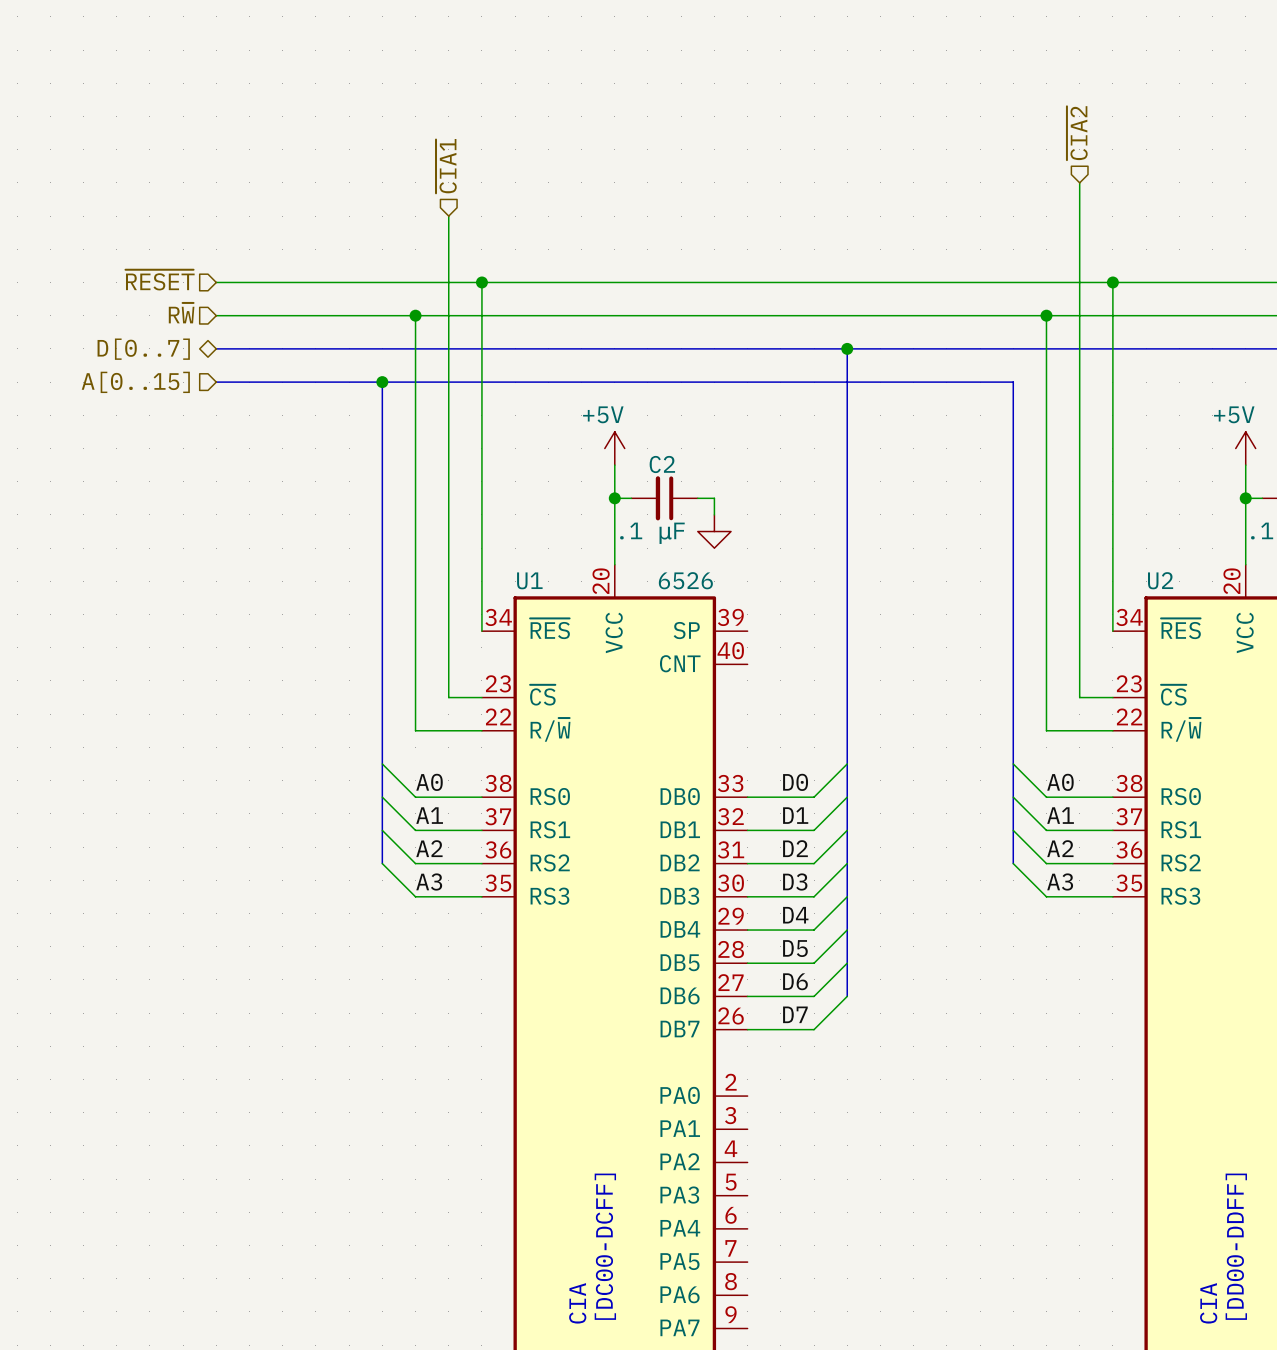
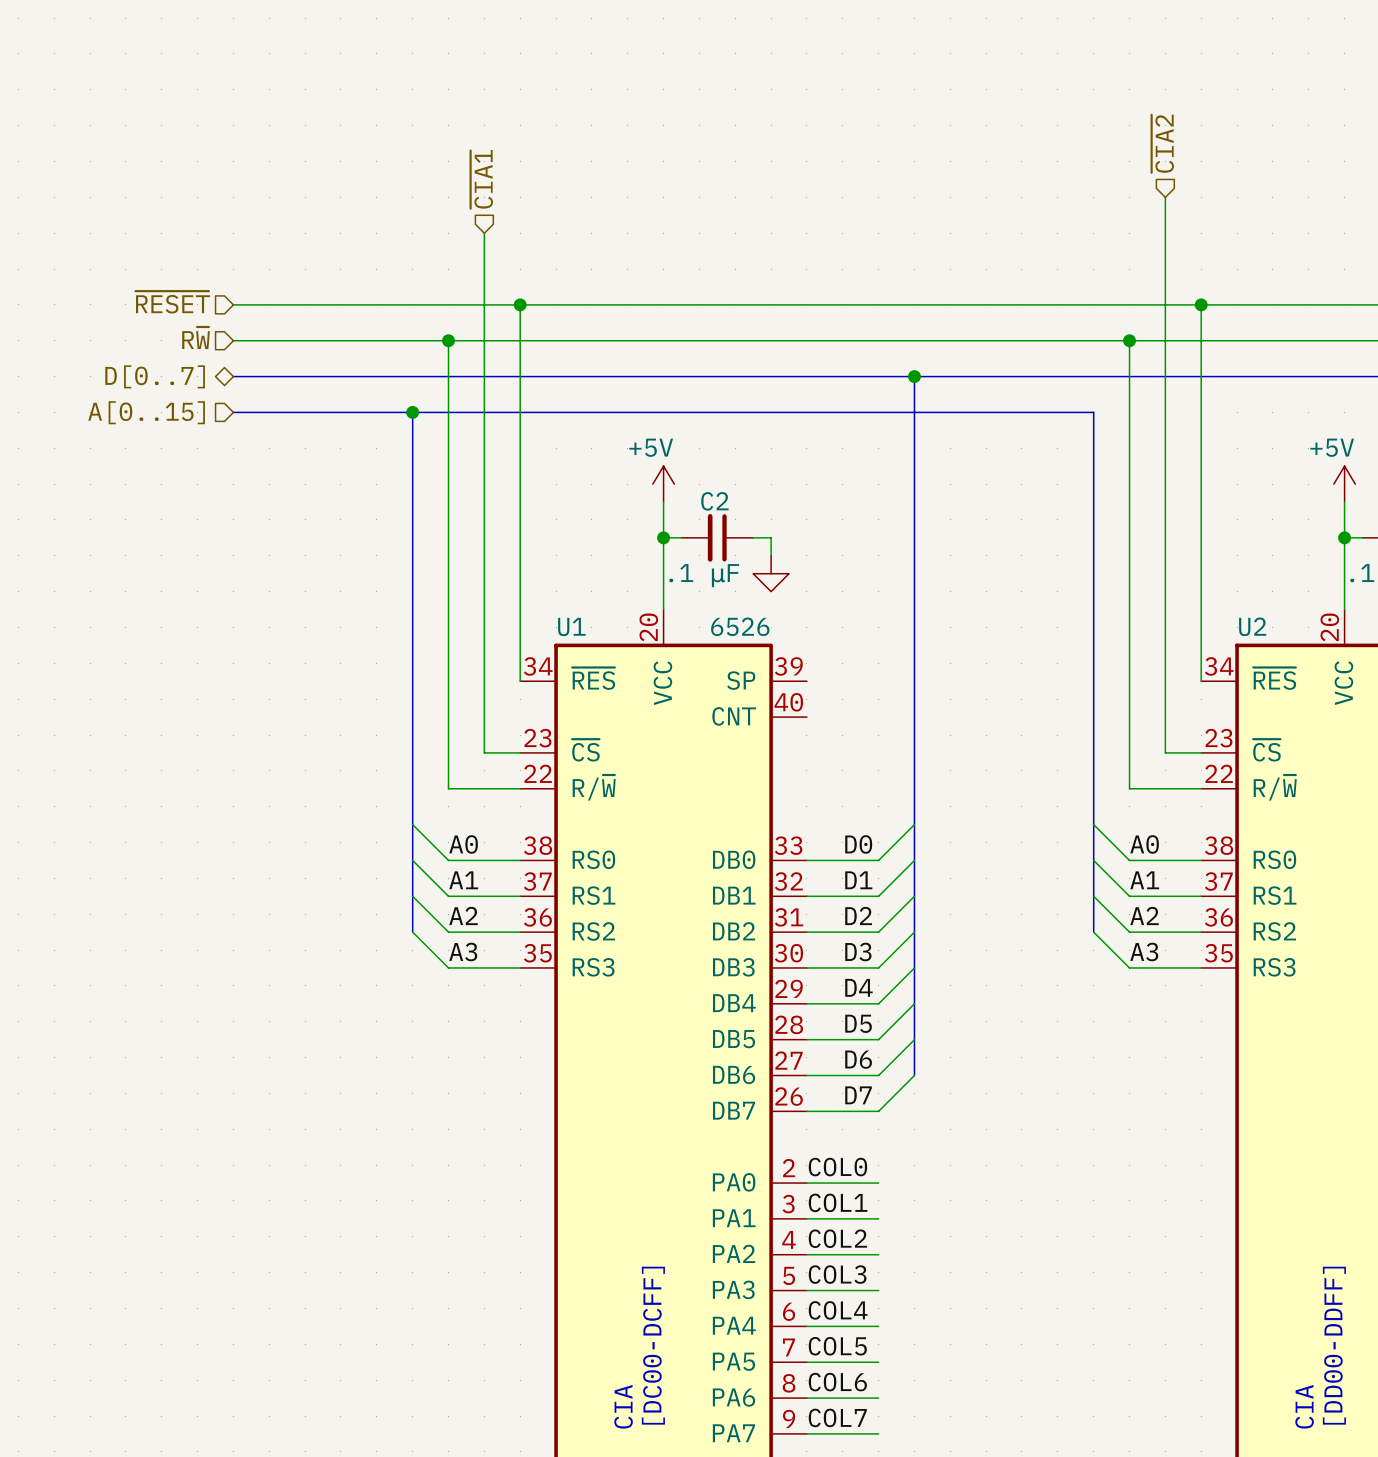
label: none -> COL0 (837, 1167)
wire: none -> (806, 1183) (878, 1183)
label: none -> COL1 (838, 1202)
wire: none -> (806, 1218) (878, 1218)
label: none -> COL2 (837, 1238)
wire: none -> (806, 1254) (878, 1254)
label: none -> COL3 (837, 1274)
wire: none -> (806, 1290) (878, 1290)
label: none -> COL4 (838, 1310)
wire: none -> (806, 1326) (878, 1326)
label: none -> COL5 (837, 1346)
wire: none -> (806, 1362) (878, 1362)
label: none -> COL6 (837, 1382)
wire: none -> (806, 1398) (878, 1398)
label: none -> COL7 (837, 1417)
wire: none -> (806, 1433) (878, 1433)

